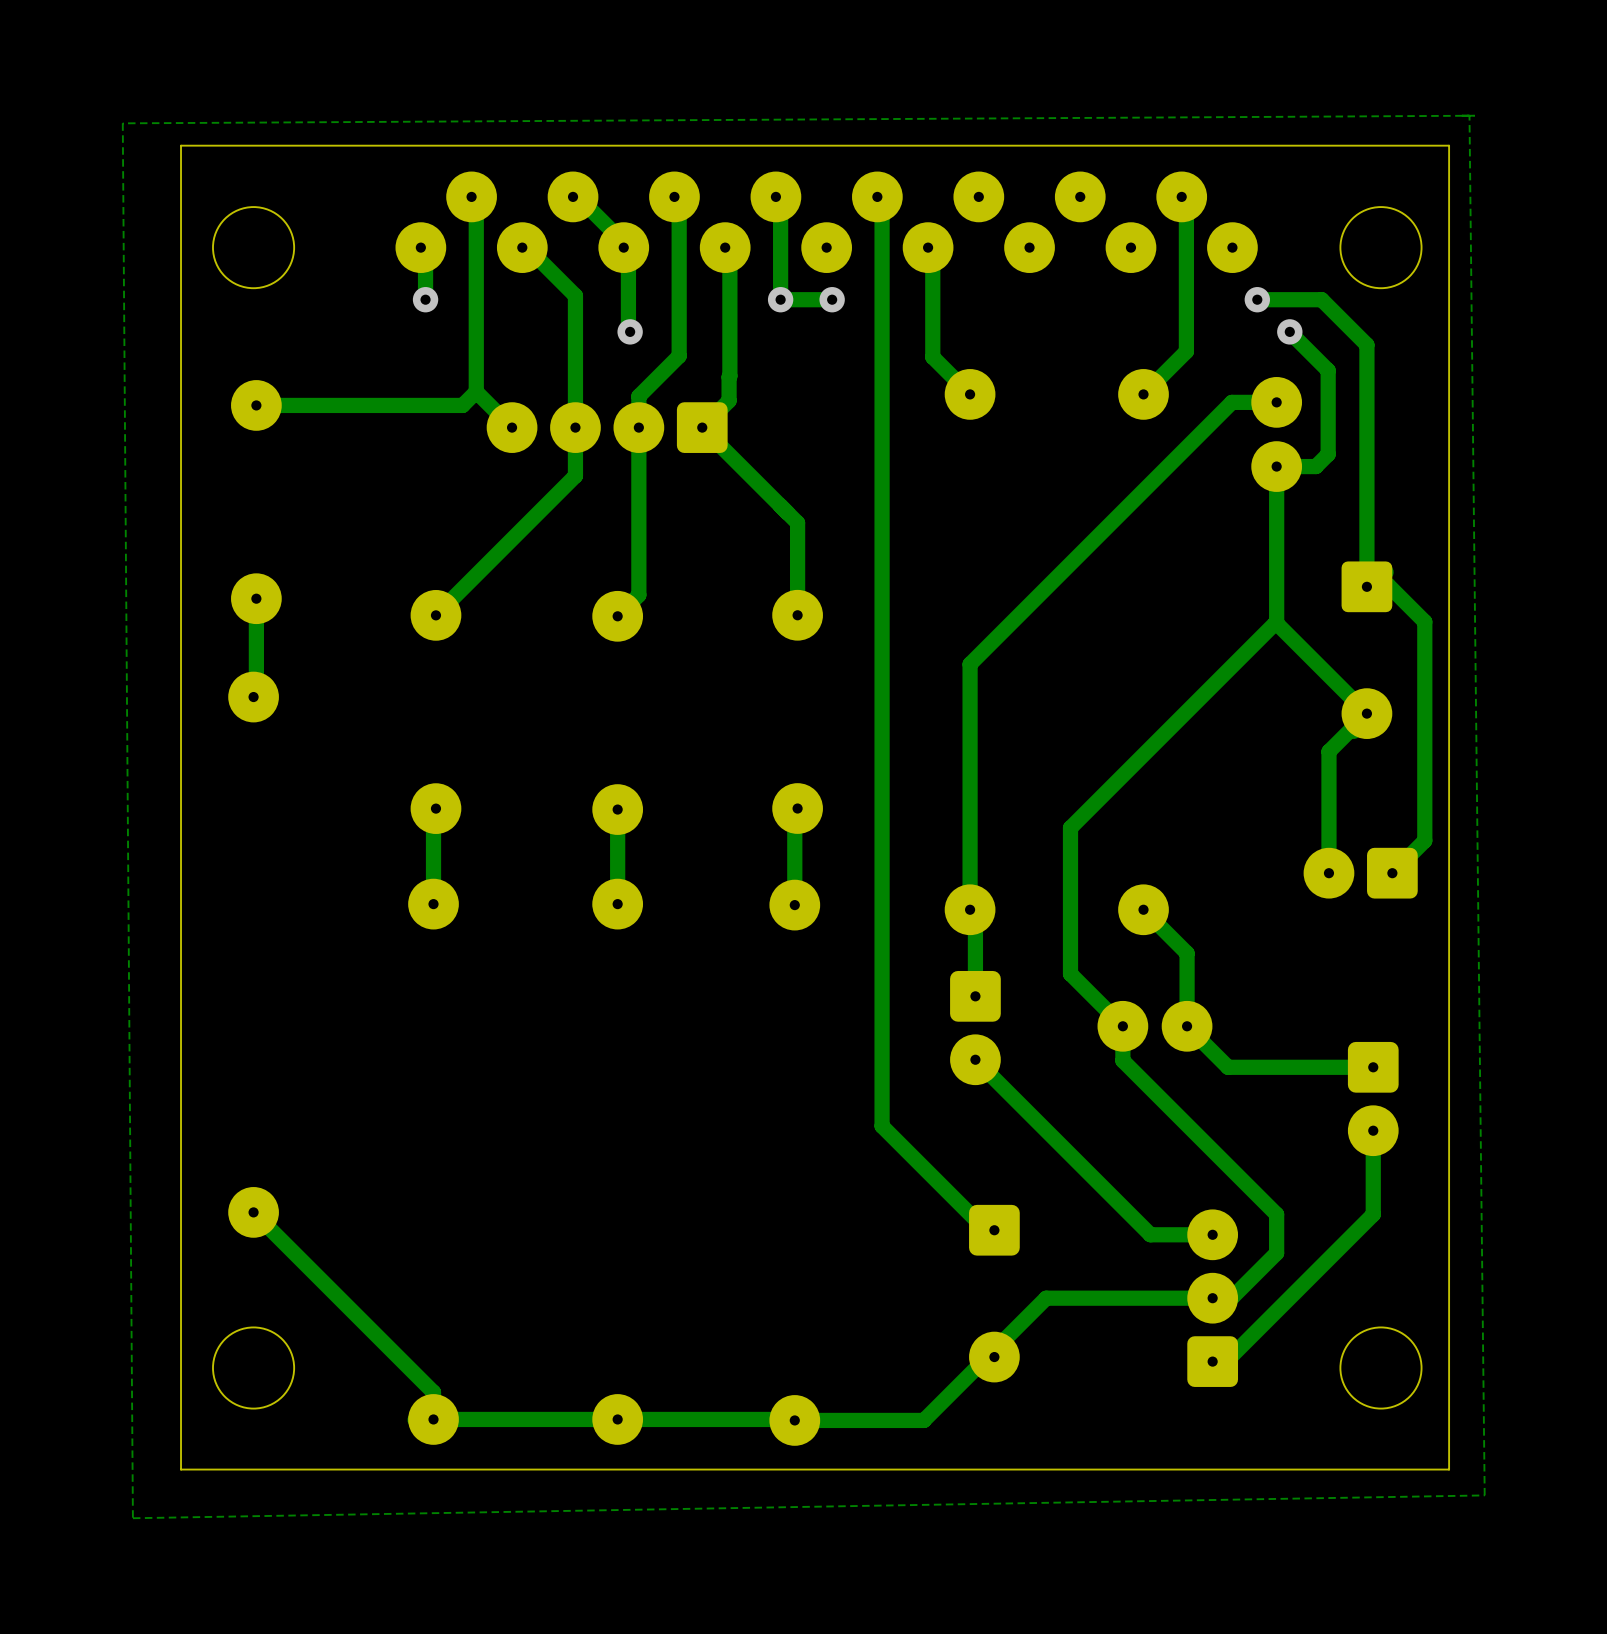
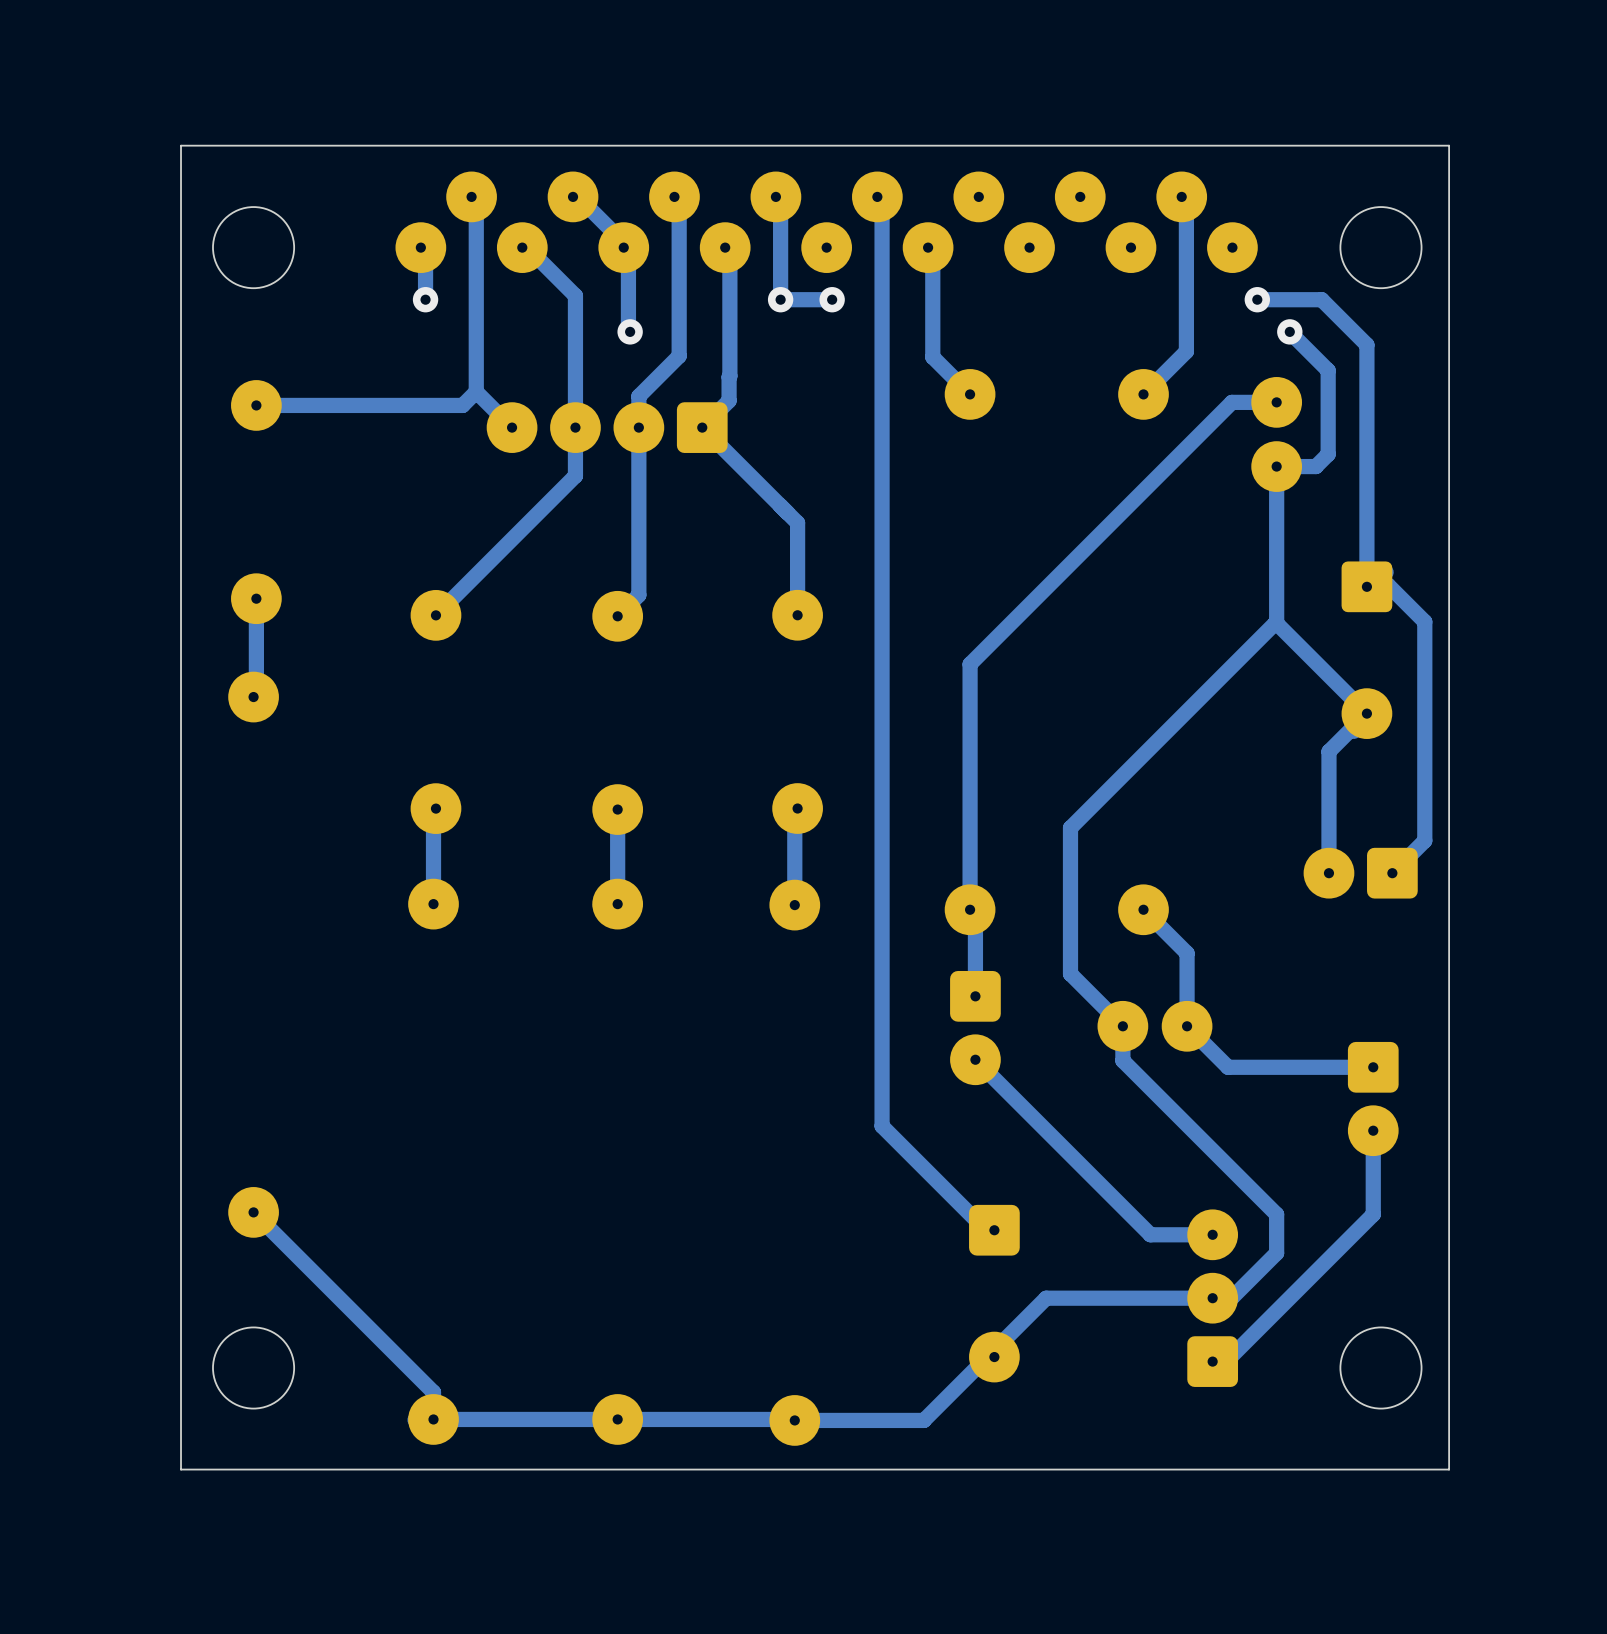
zone outline: (1469, 115) (1484, 1495) (132, 1518) (122, 123) (1474, 115) (1461, 115) -> none

